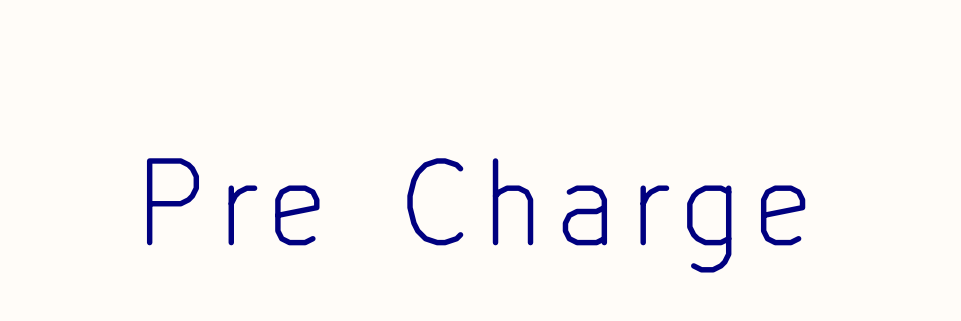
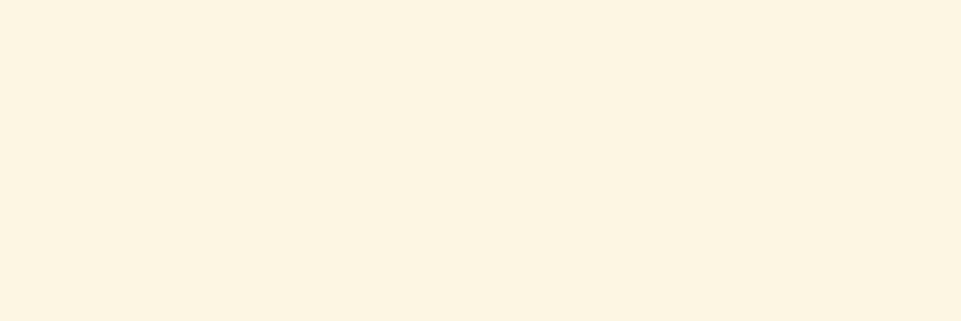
text: Pre Charge (476, 215) -> none

